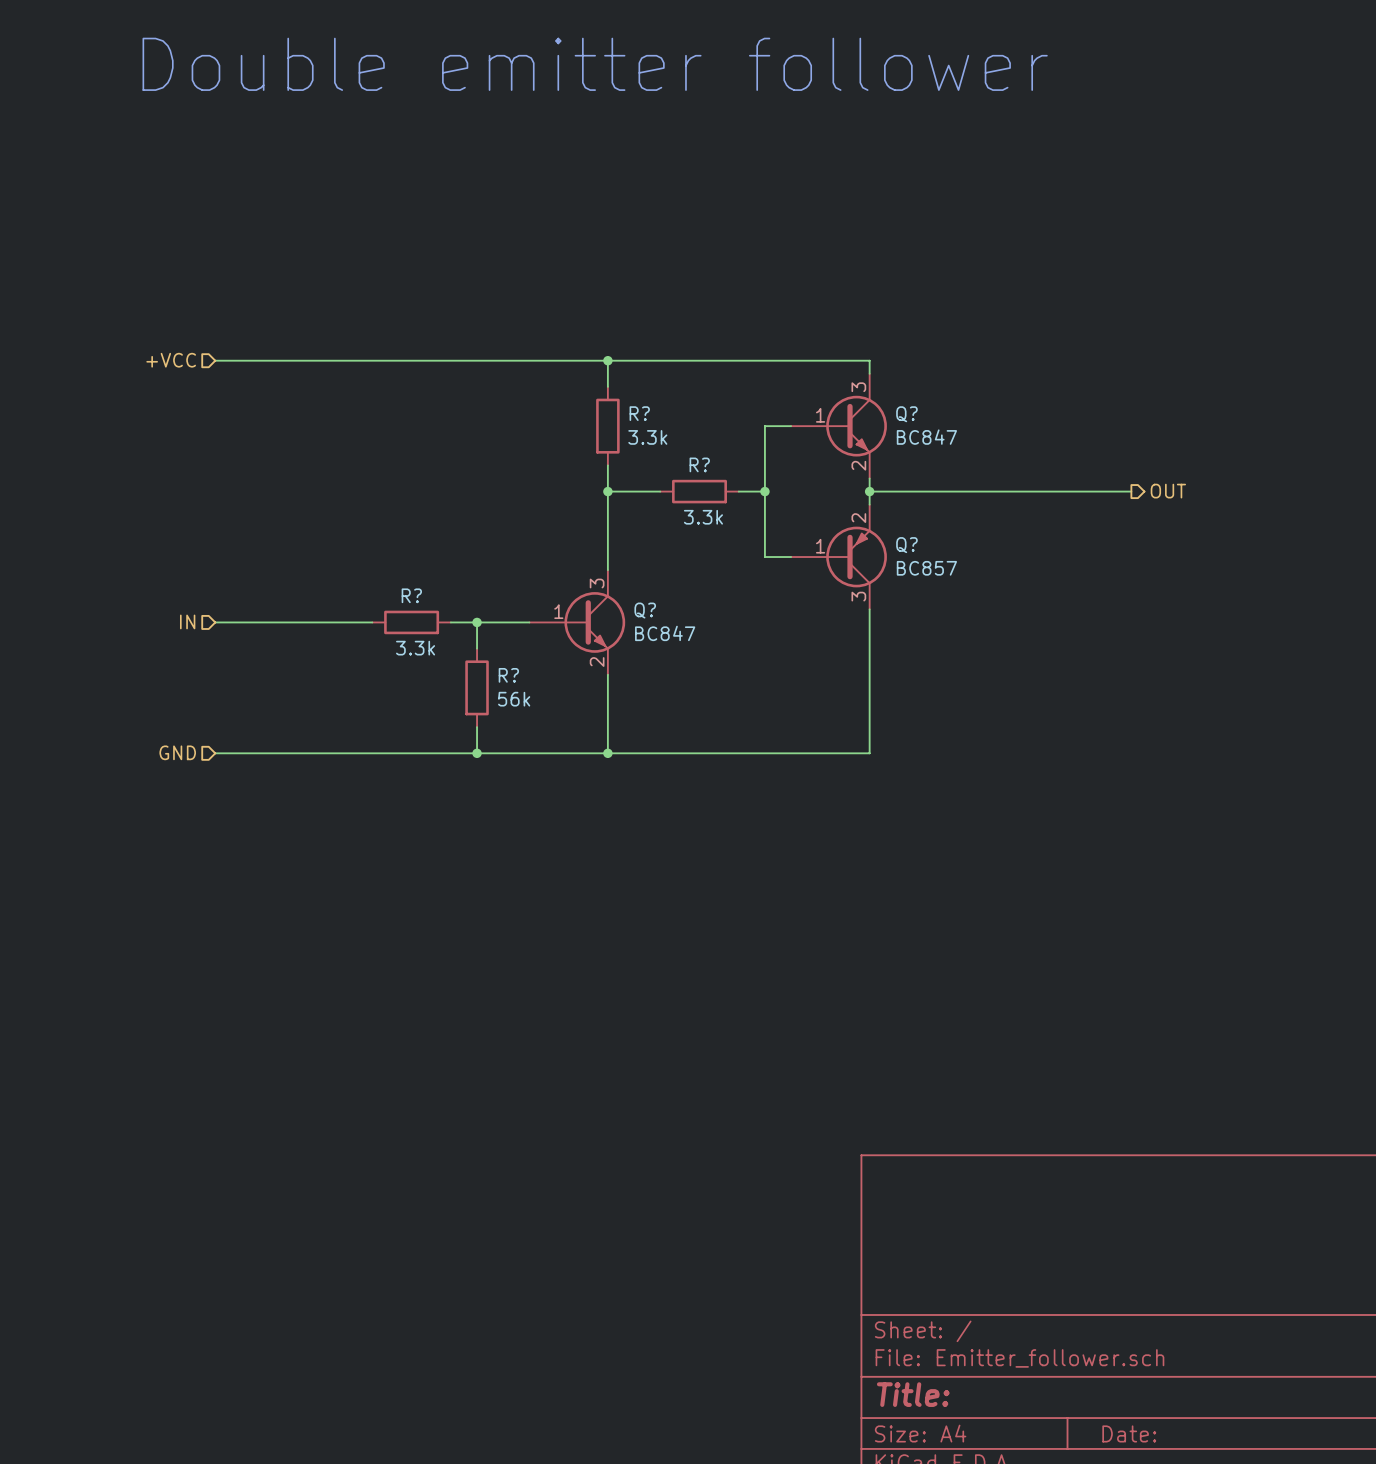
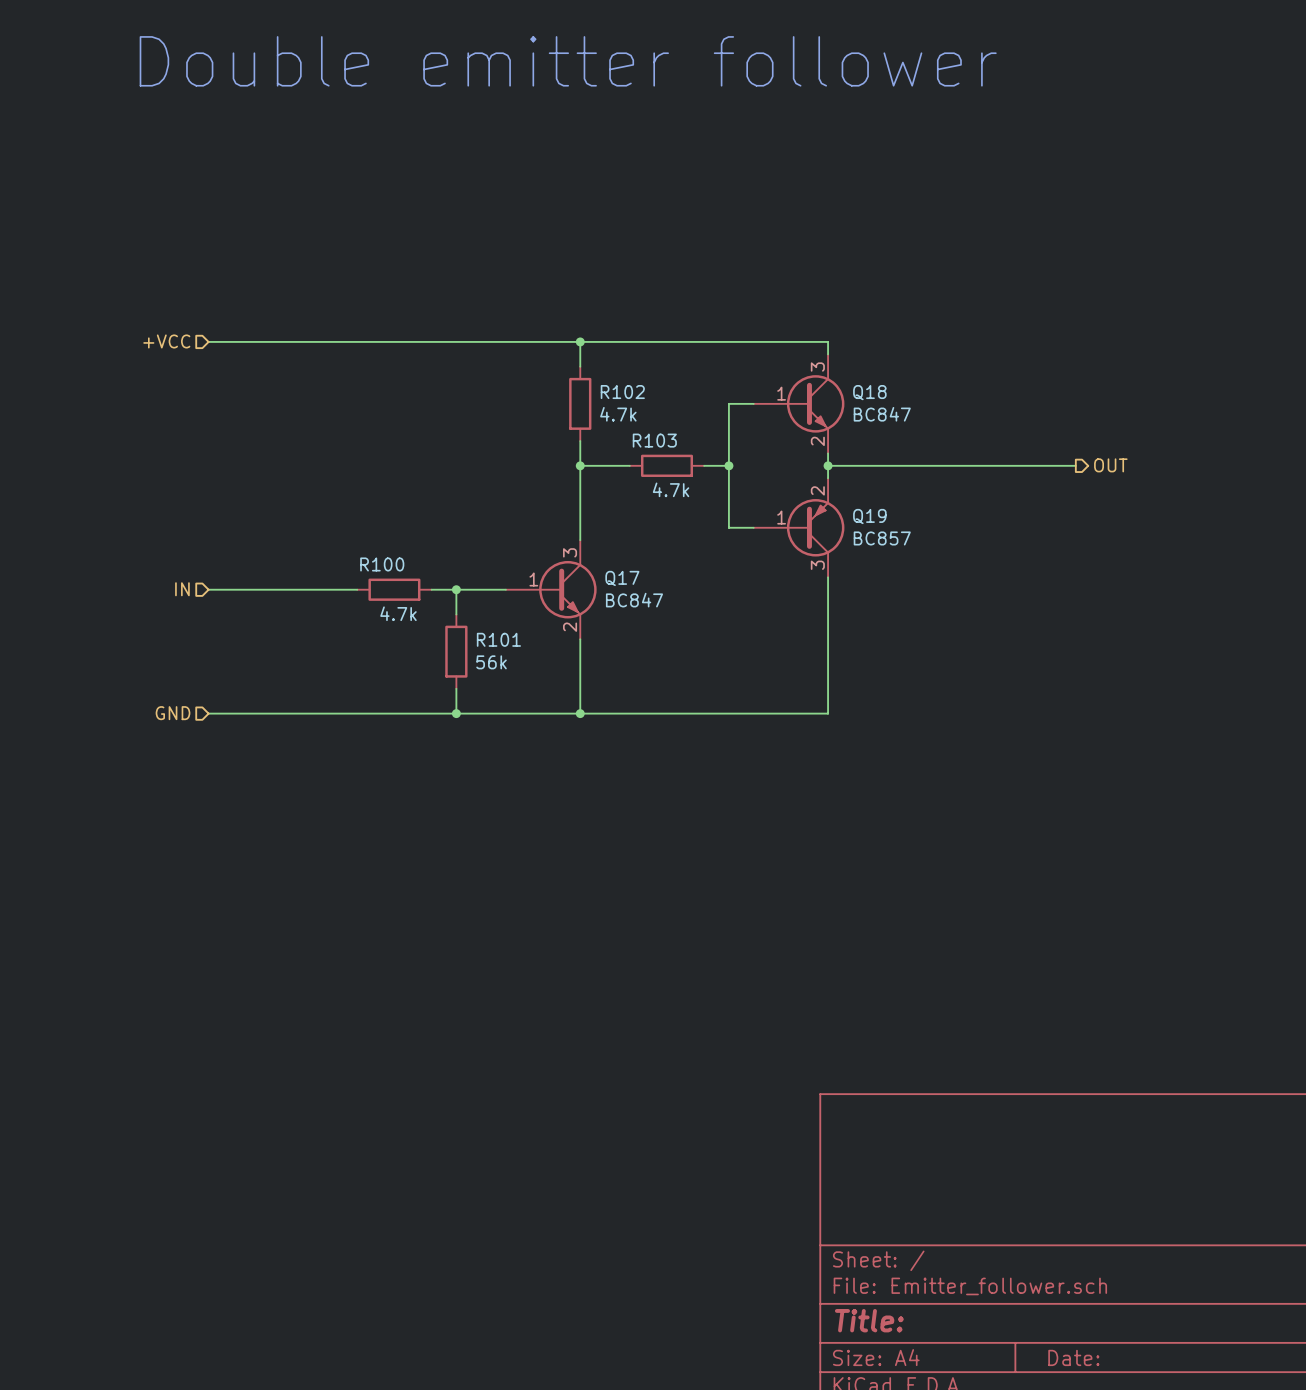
R? name: R? (639, 413) -> R102 (622, 392)
Q? name: Q? (906, 414) -> Q18 (869, 392)
R? value: 3.3k (647, 437) -> 4.7k (618, 414)
R? name: R? (699, 464) -> R103 (654, 440)
R? value: 3.3k (703, 517) -> 4.7k (671, 489)
Q? name: Q? (906, 545) -> Q19 (869, 516)
R? name: R? (411, 595) -> R100 (382, 564)
Q? name: Q? (645, 610) -> Q17 (622, 578)
R? value: 3.3k (415, 648) -> 4.7k (398, 613)
R? name: R? (508, 675) -> R101 (498, 639)

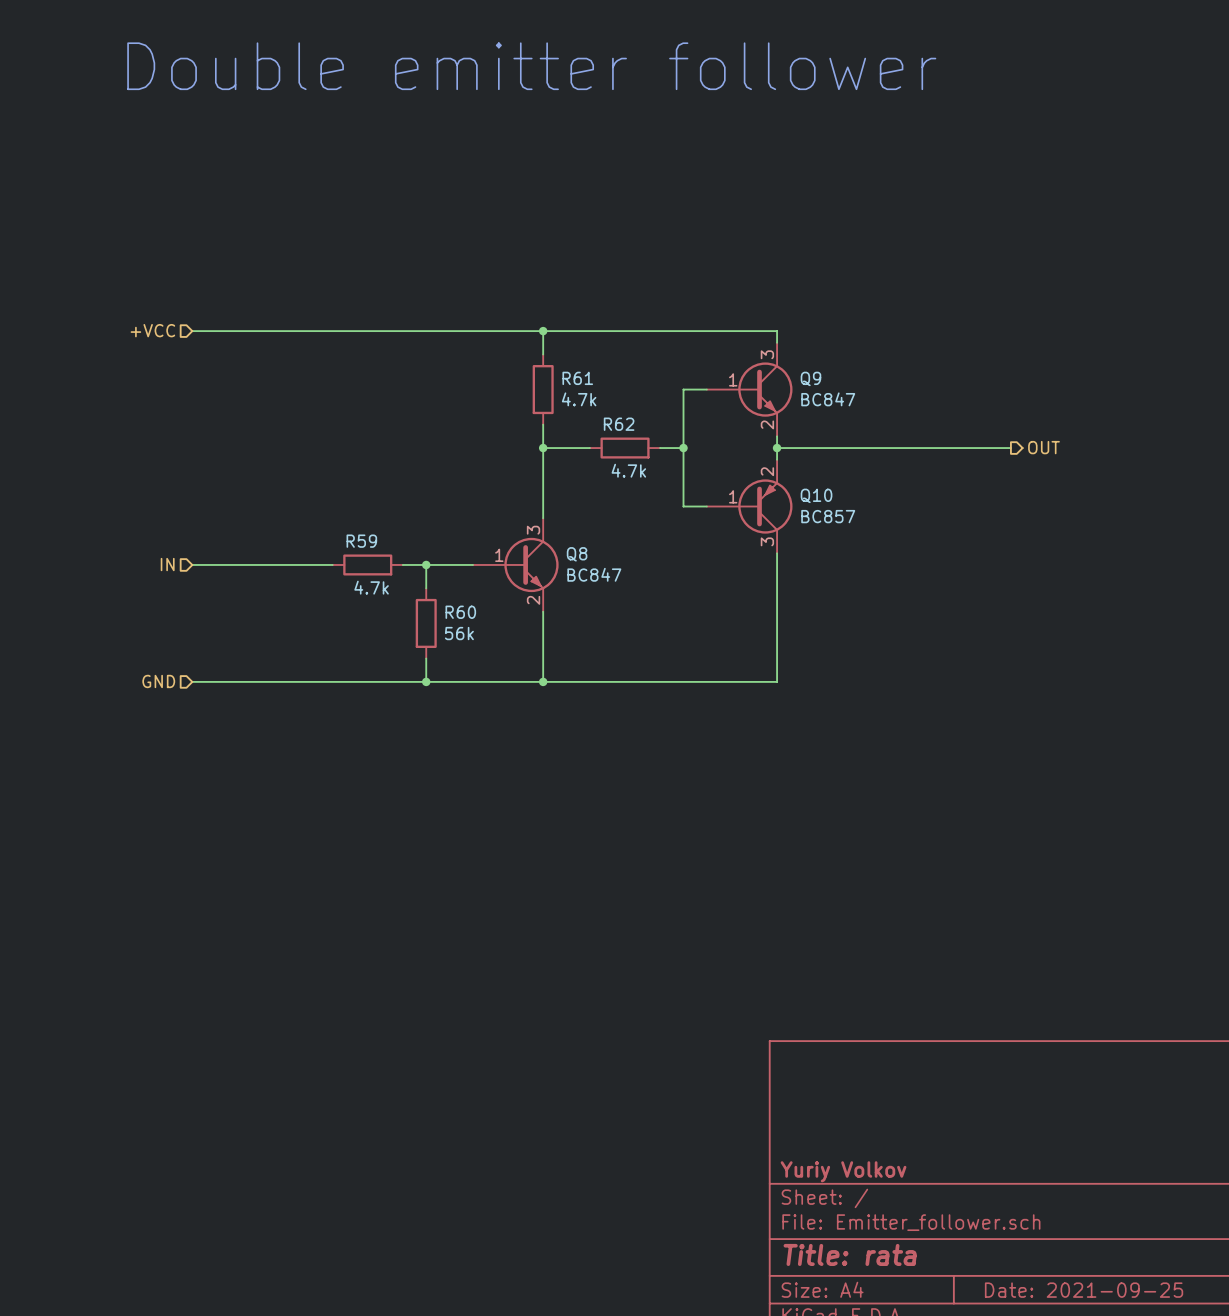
R102 name: R102 (622, 392) -> R61 (577, 378)
Q18 name: Q18 (869, 392) -> Q9 (810, 378)
R103 name: R103 (654, 440) -> R62 (619, 424)
Q19 name: Q19 (869, 516) -> Q10 (816, 495)
R100 name: R100 (382, 564) -> R59 (361, 541)
Q17 name: Q17 (622, 578) -> Q8 (577, 554)
R101 name: R101 (498, 639) -> R60 (460, 612)
title block: none -> Yuriy Volkov (843, 1171)
title block: Title: (869, 1320) -> Title: rata (850, 1254)
title block: Date: (1073, 1357) -> Date: 2021-09-25 (1084, 1290)

